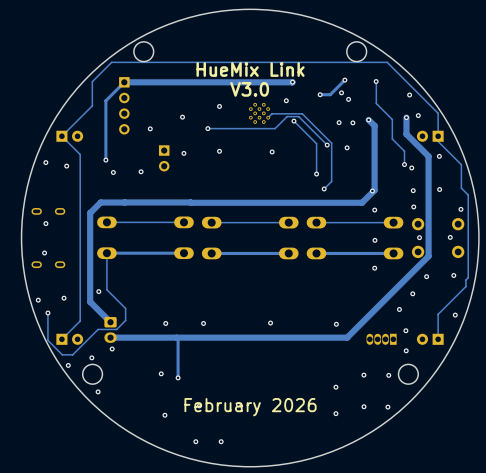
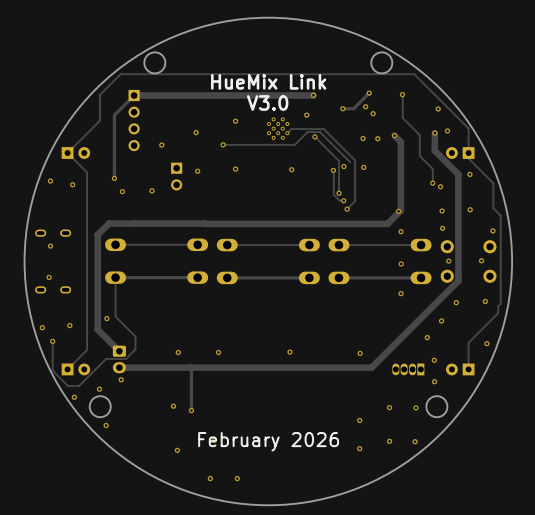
via: (327, 145) -> none
via: (347, 147) -> none
via: none -> (343, 166)
via: none -> (363, 167)
track: none -> (333, 170) (333, 194) (339, 200) (343, 200)
via: none -> (333, 170)
via: none -> (343, 200)

